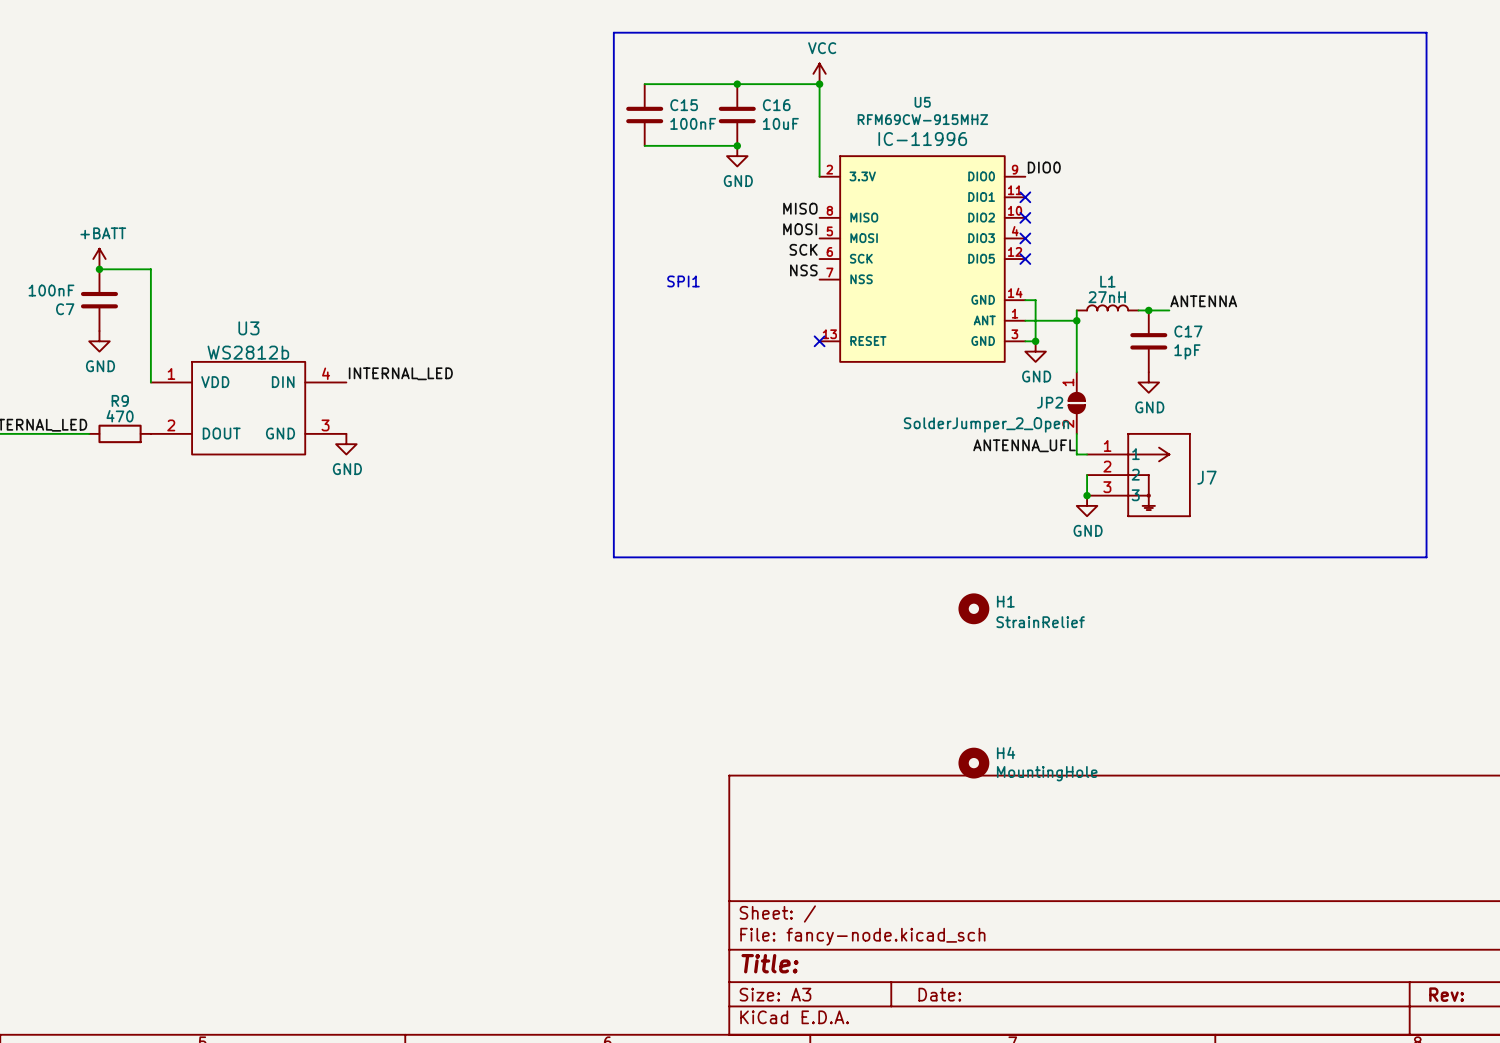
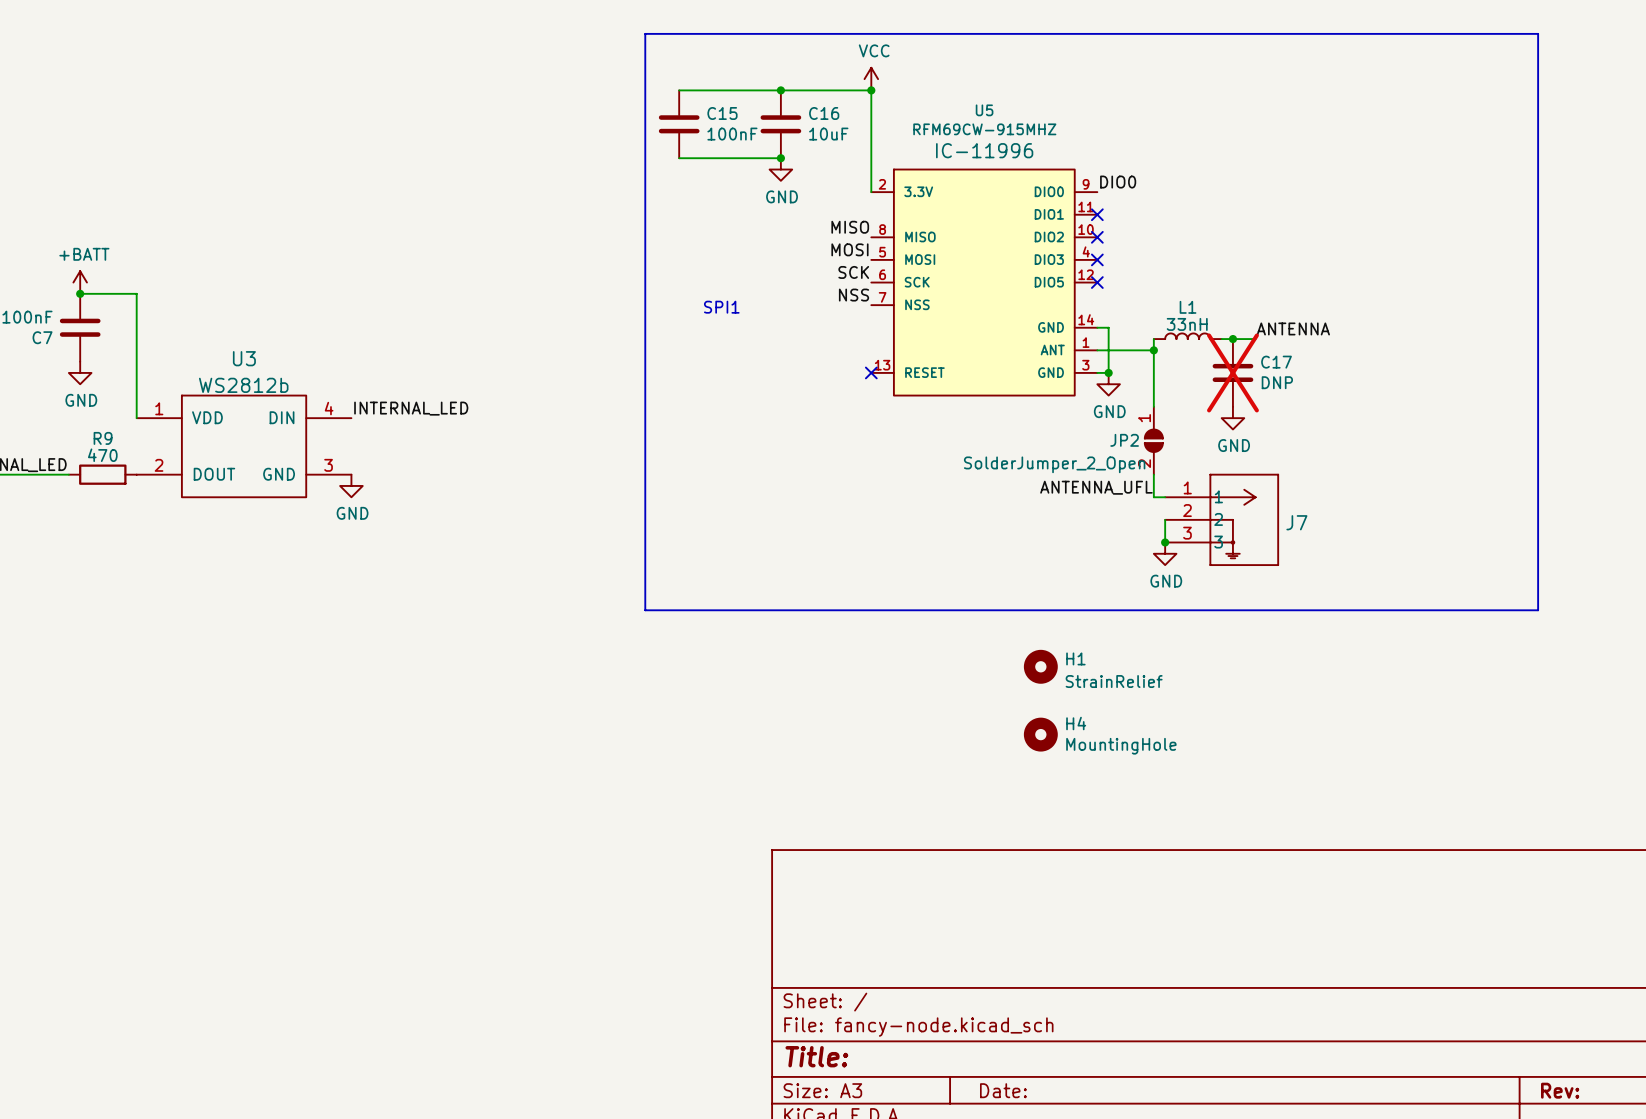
L1 value: 27nH (1107, 297) -> 33nH (1187, 324)
C17 do-not-place cross: none -> (1232, 372)
C17 value: 1pF (1187, 351) -> DNP (1277, 382)
H4 position: (973, 763) -> (1040, 734)

